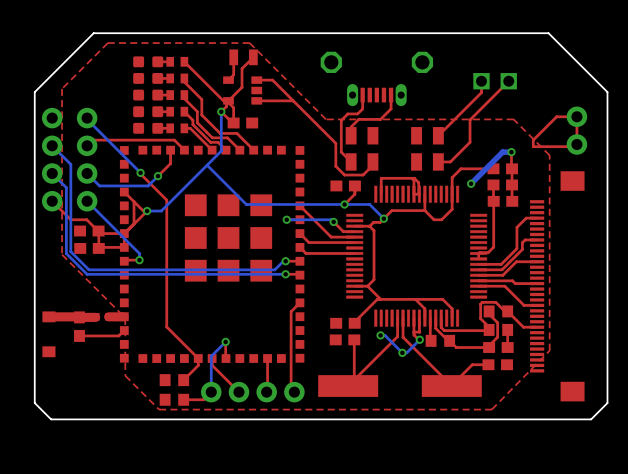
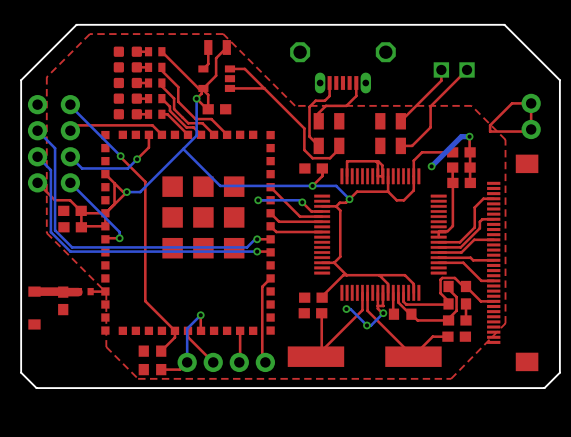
top track width: thick (124, 316) (108, 316) -> thin (105, 291) (90, 291)
top track: (124, 330) (118, 335) (79, 335) -> none

